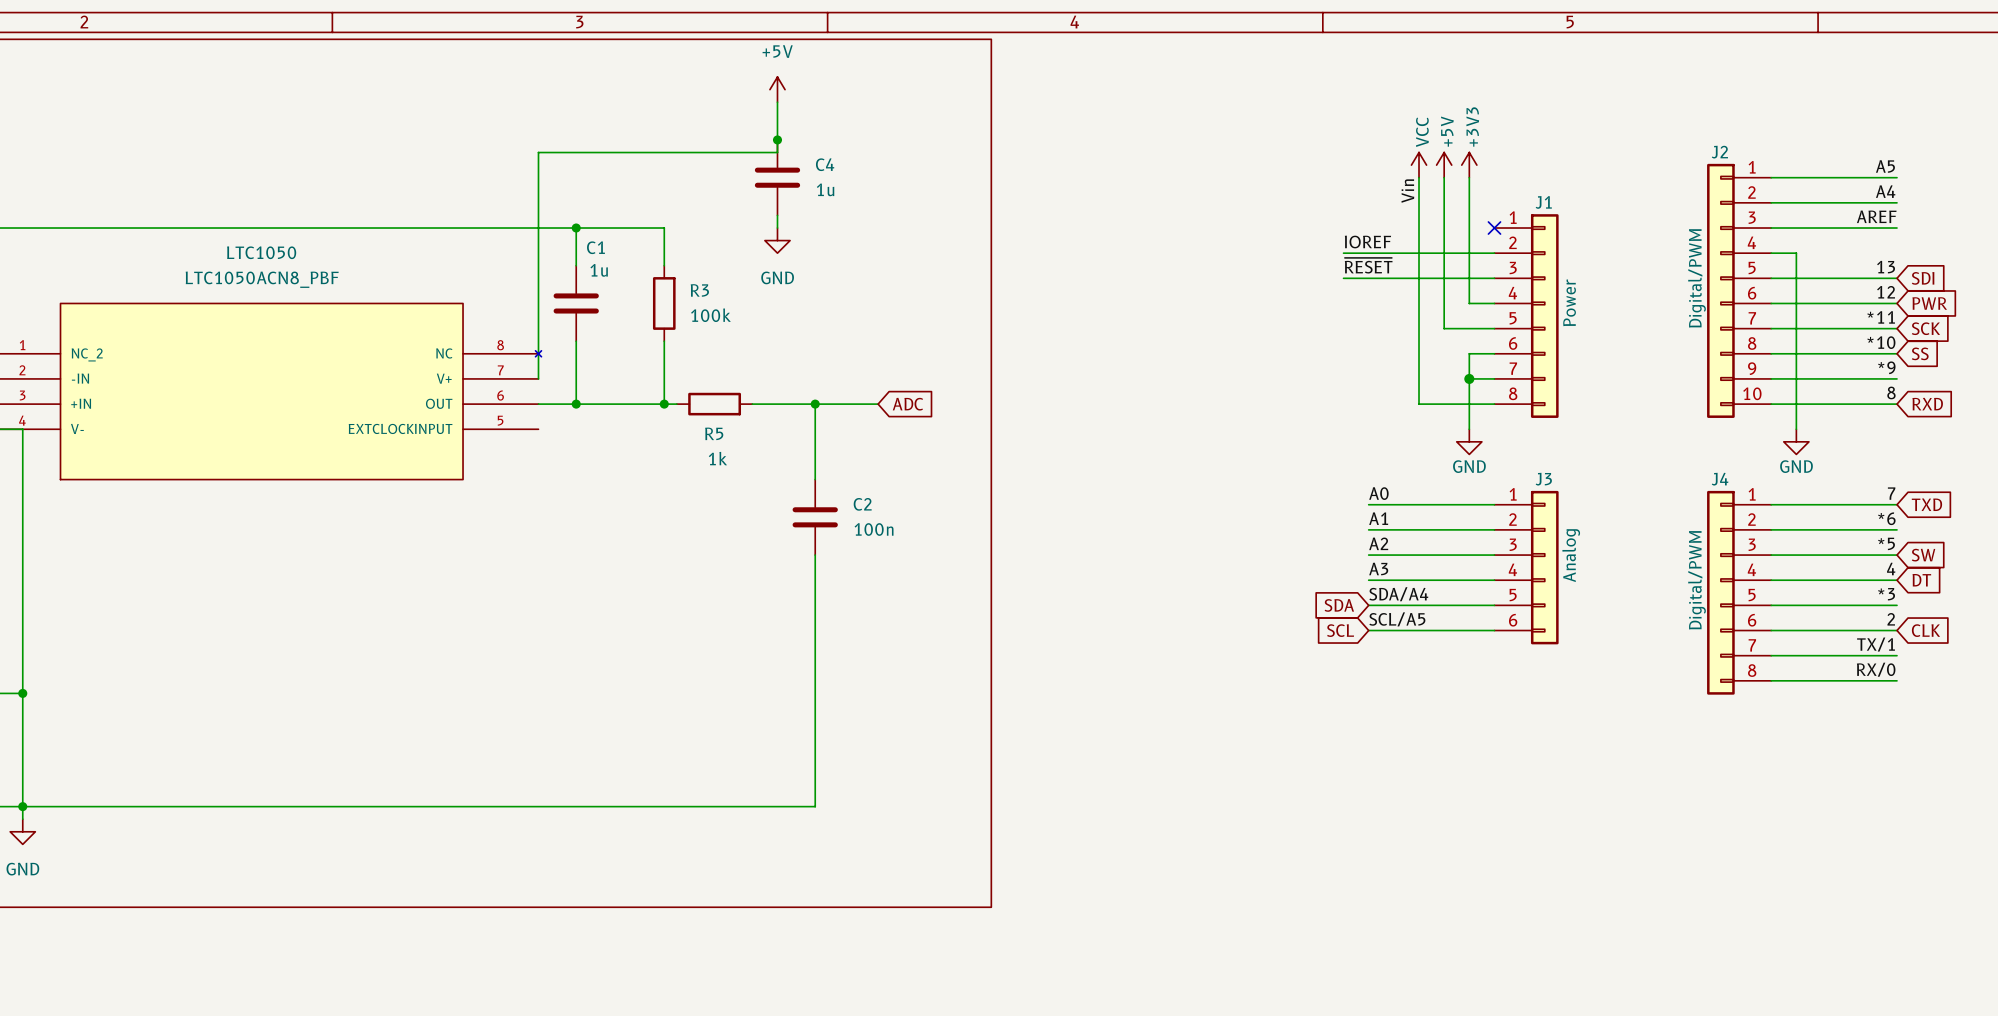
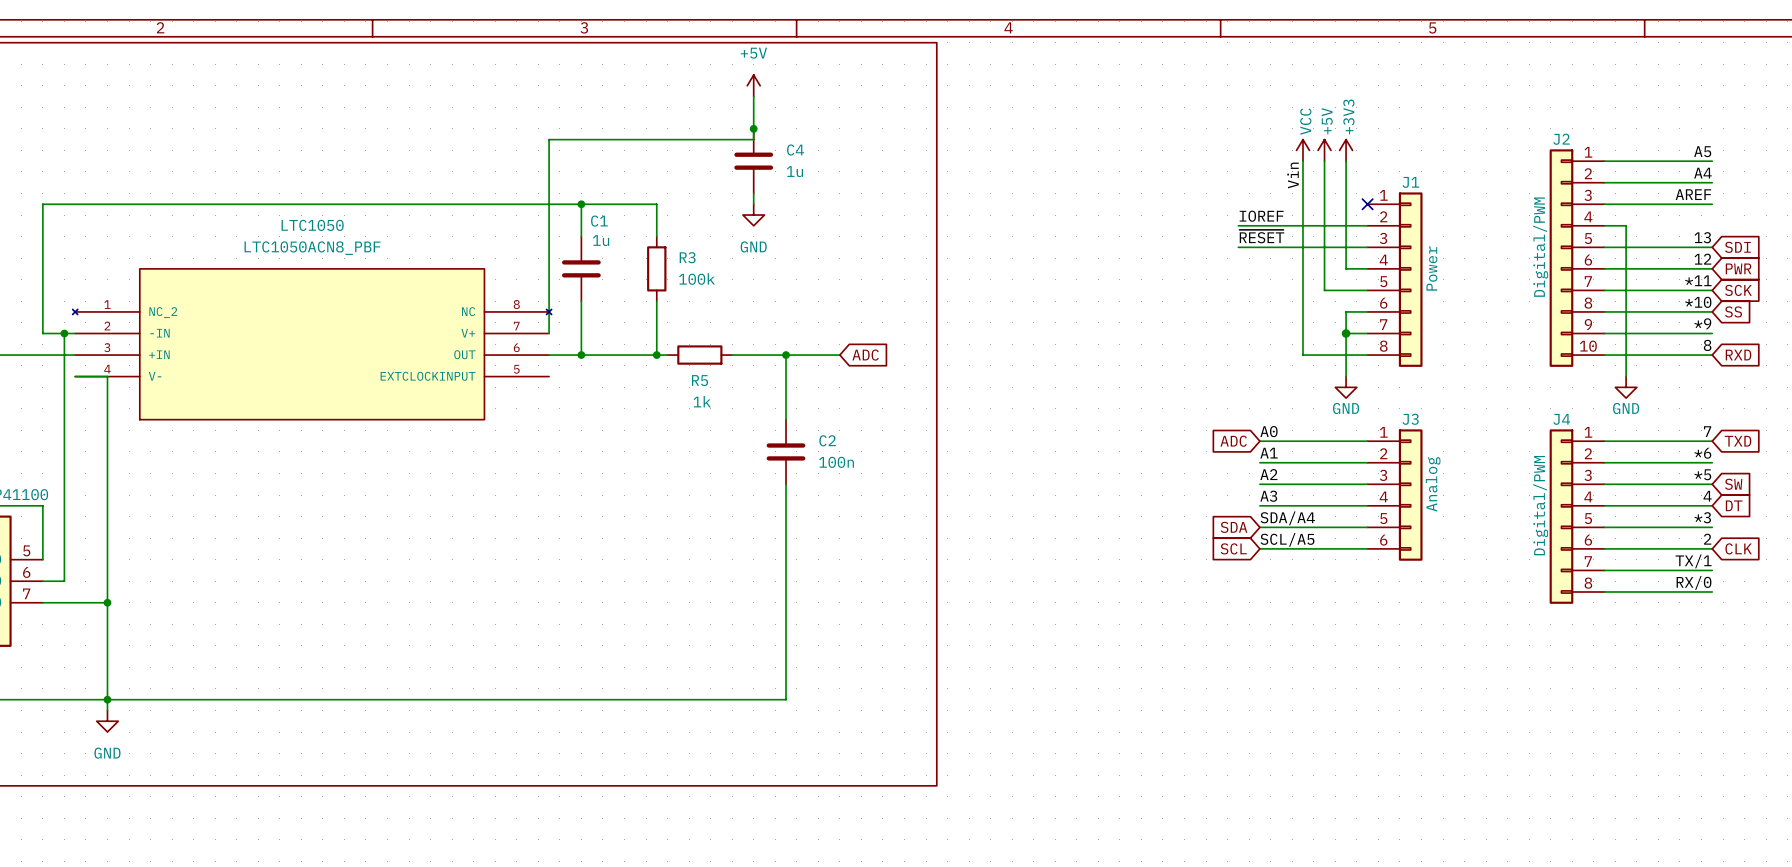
global label: none -> ADC (1233, 441)

